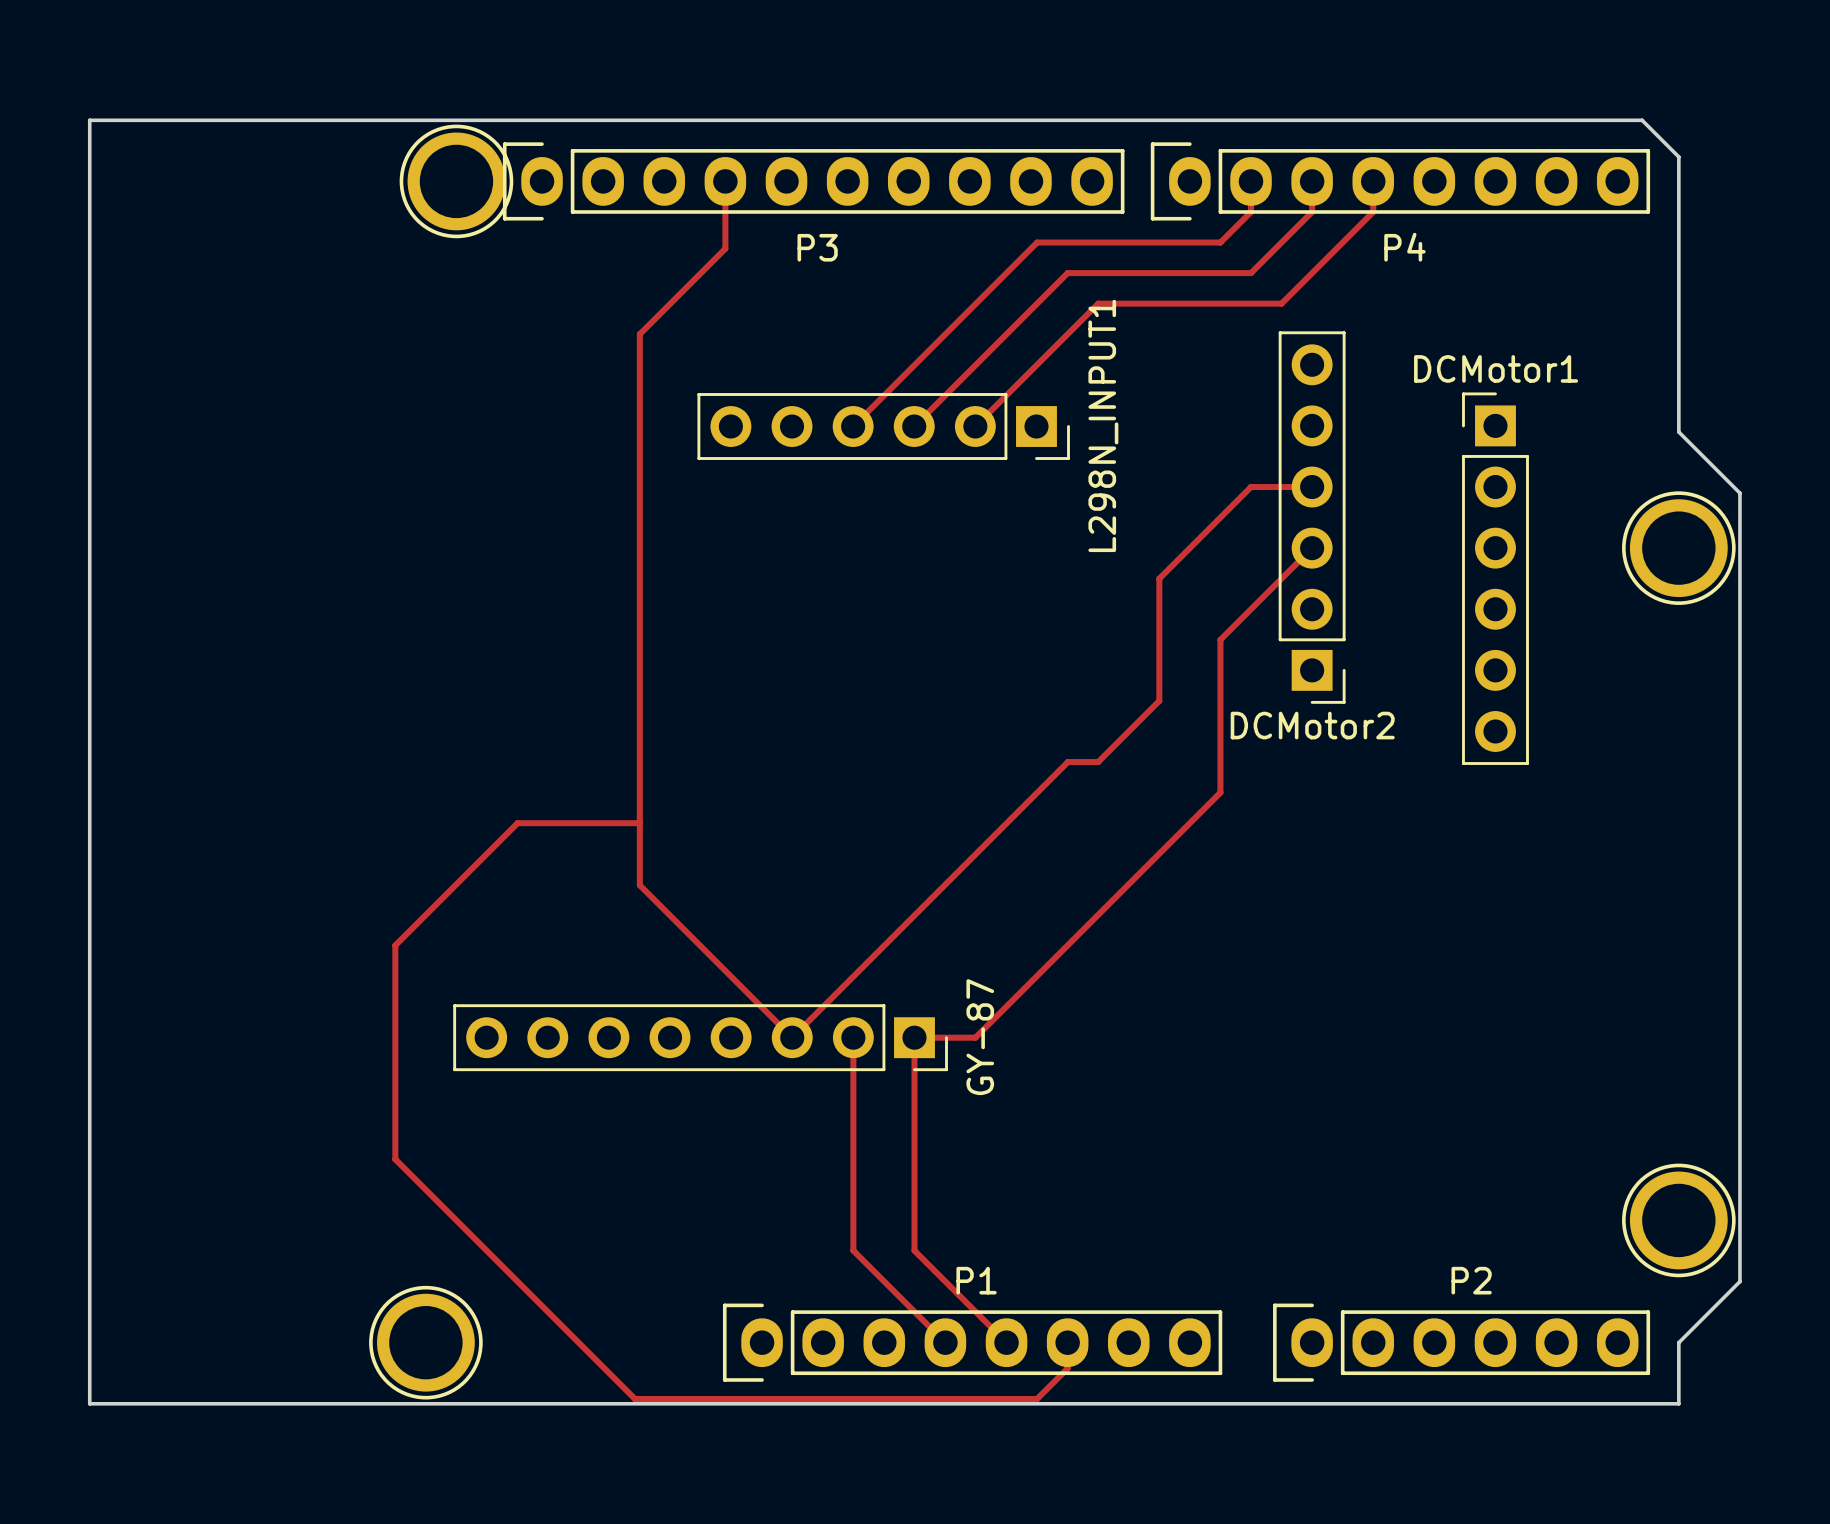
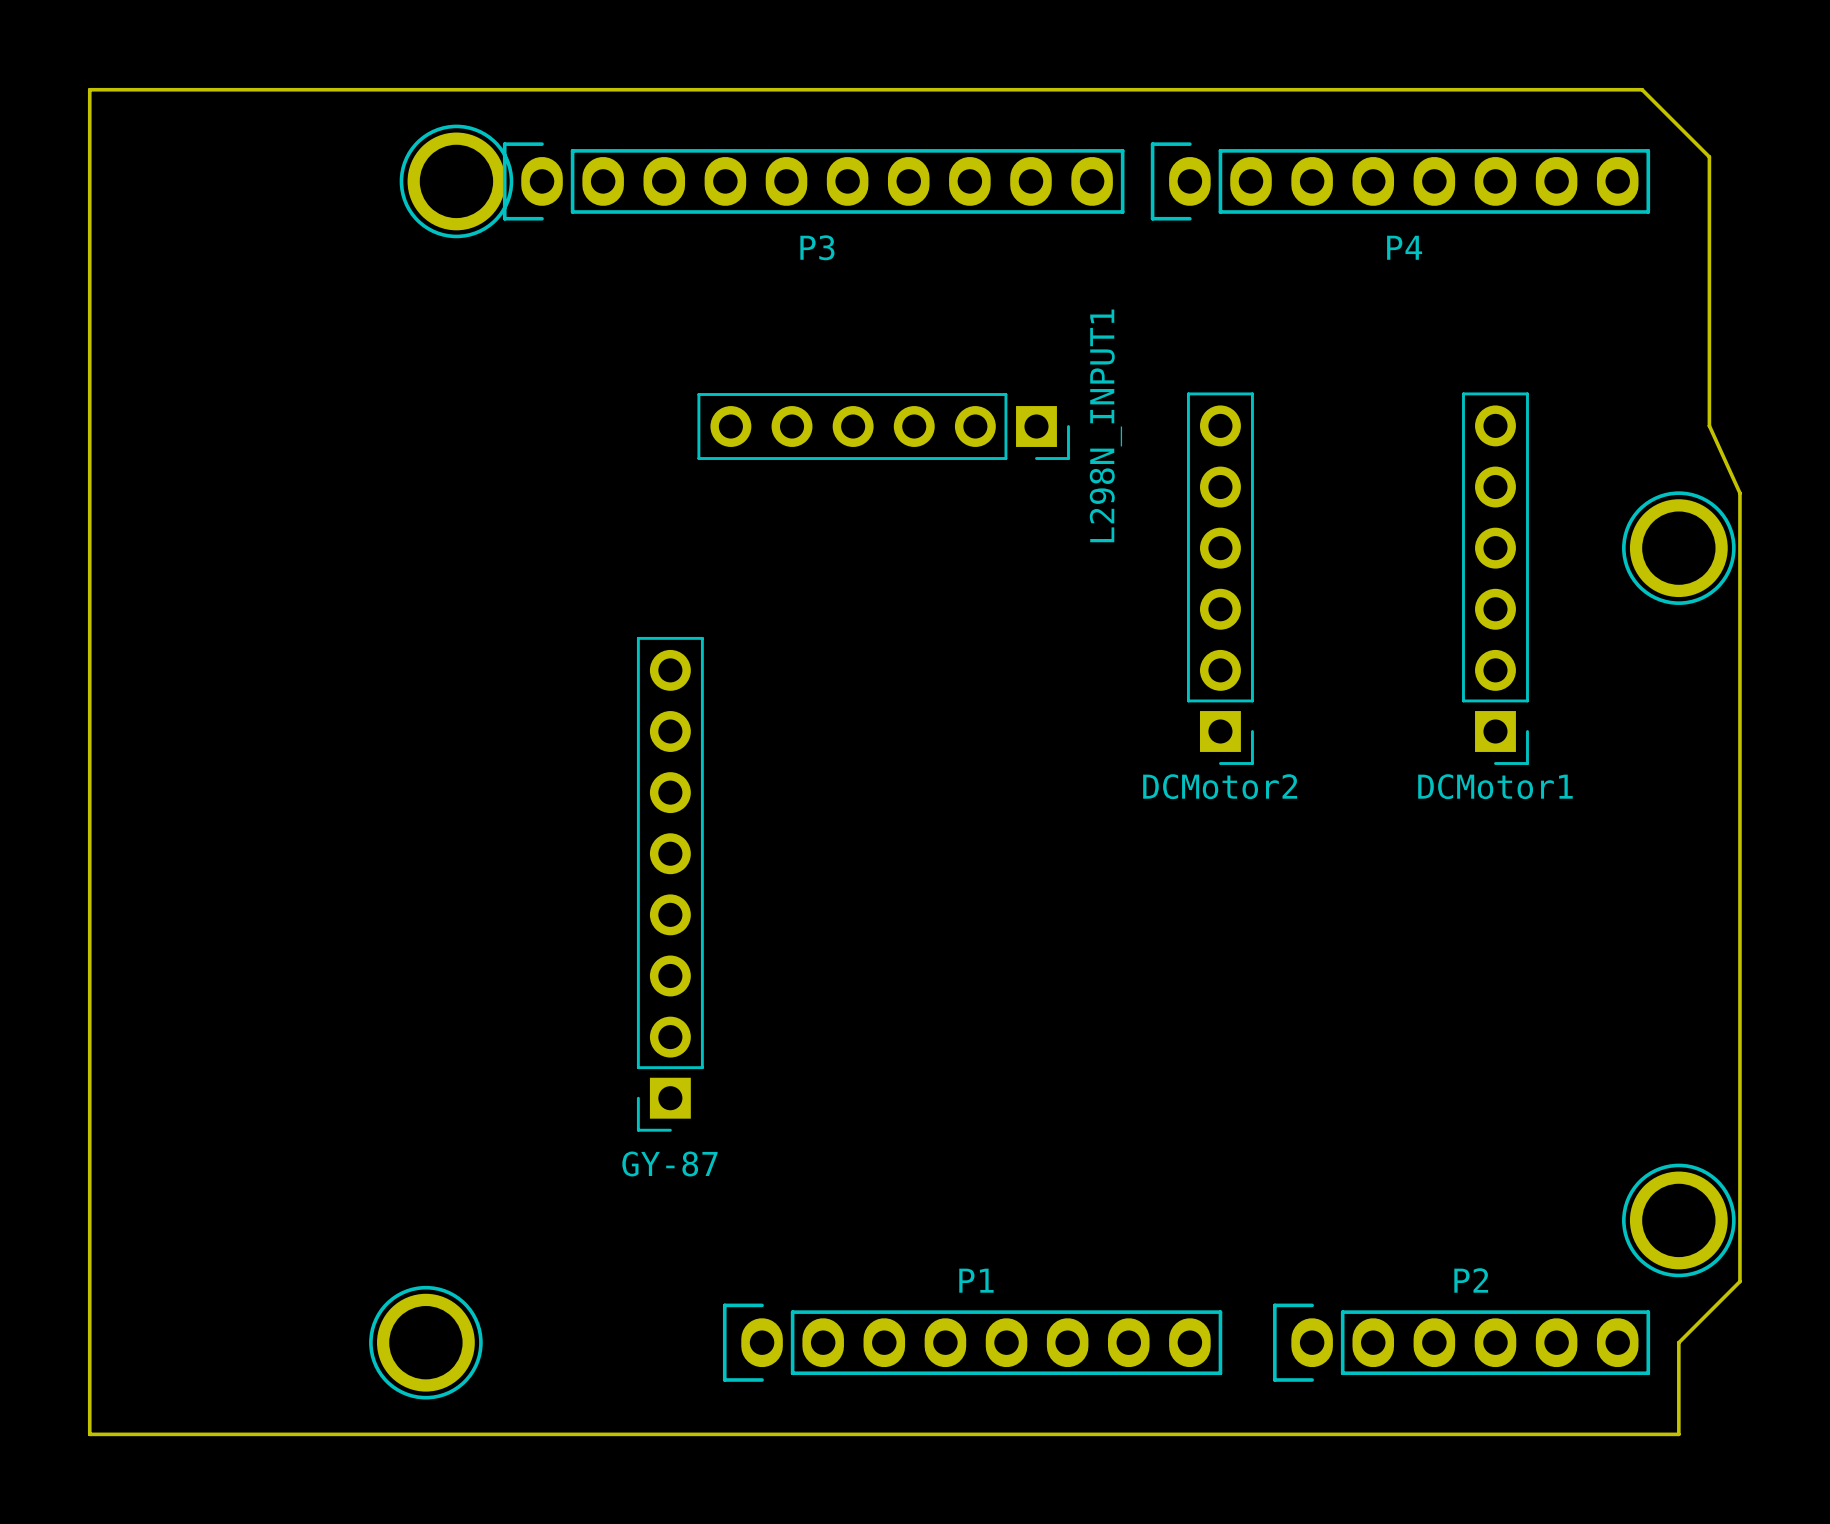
board edge: (89, 120) (1642, 120) (1678, 156) (1678, 432) (1739, 493) -> (89, 120) (89, 89) (1642, 89) (1709, 156) (1709, 425) (1739, 493)
track: (725, 181) (725, 248) (639, 334) (639, 885) (792, 1037) (1067, 762) (1098, 762) (1159, 700) (1159, 578) (1251, 487) (1312, 487) -> none
track: (1251, 181) (1251, 211) (1220, 242) (1037, 242) (853, 426) -> none
track: (1312, 181) (1312, 211) (1251, 273) (1067, 273) (914, 426) -> none
track: (1373, 181) (1373, 211) (1281, 303) (1098, 303) (975, 426) -> none
DCMotor2 position: (1312, 517) -> (1220, 578)
track: (1312, 548) (1220, 639) (1220, 792) (975, 1037) (914, 1037) (914, 1250) (1006, 1342) -> none
DCMotor1 rotation: 0° (1495, 578) -> 180° (1495, 578)
track: (639, 823) (517, 823) (395, 945) (395, 1159) (635, 1399) (1037, 1399) (1067, 1368) (1067, 1342) -> none
GY-87 rotation: 0° (700, 1037) -> 90° clockwise (670, 884)
track: (853, 1037) (853, 1250) (945, 1342) -> none
board edge: (89, 1403) (1678, 1403) -> (89, 1403) (89, 1434) (1678, 1434) (1678, 1403)

